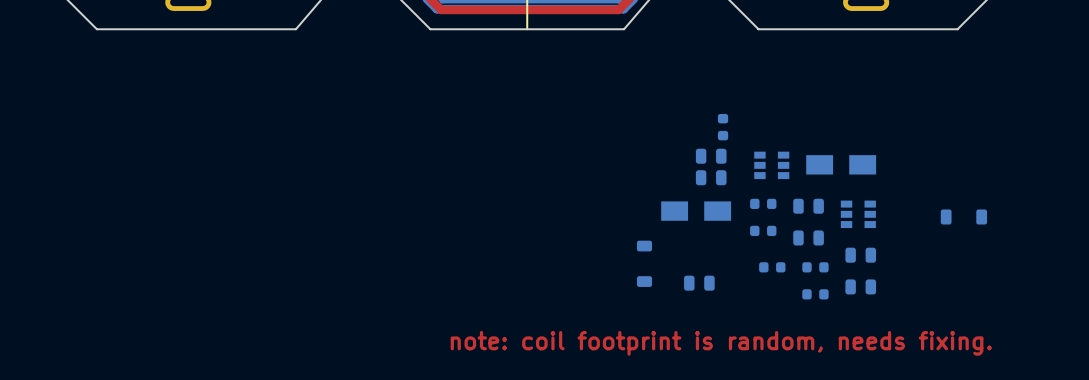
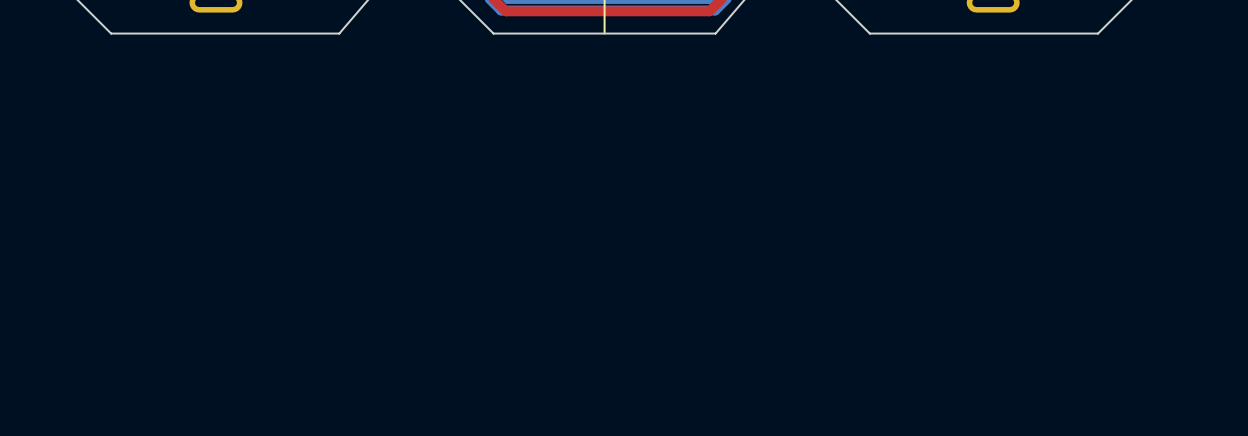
part: (723, 127) -> none
part: (711, 156) -> none
part: (841, 164) -> none
part: (771, 165) -> none
part: (711, 177) -> none
part: (763, 203) -> none
part: (808, 206) -> none
part: (696, 211) -> none
part: (858, 214) -> none
part: (963, 216) -> none
part: (763, 230) -> none
part: (808, 237) -> none
part: (860, 255) -> none
part: (644, 263) -> none
part: (772, 267) -> none
part: (815, 267) -> none
part: (699, 283) -> none
part: (860, 286) -> none
part: (815, 294) -> none
text: note: coil footprint is random, needs fixing. (721, 343) -> none

